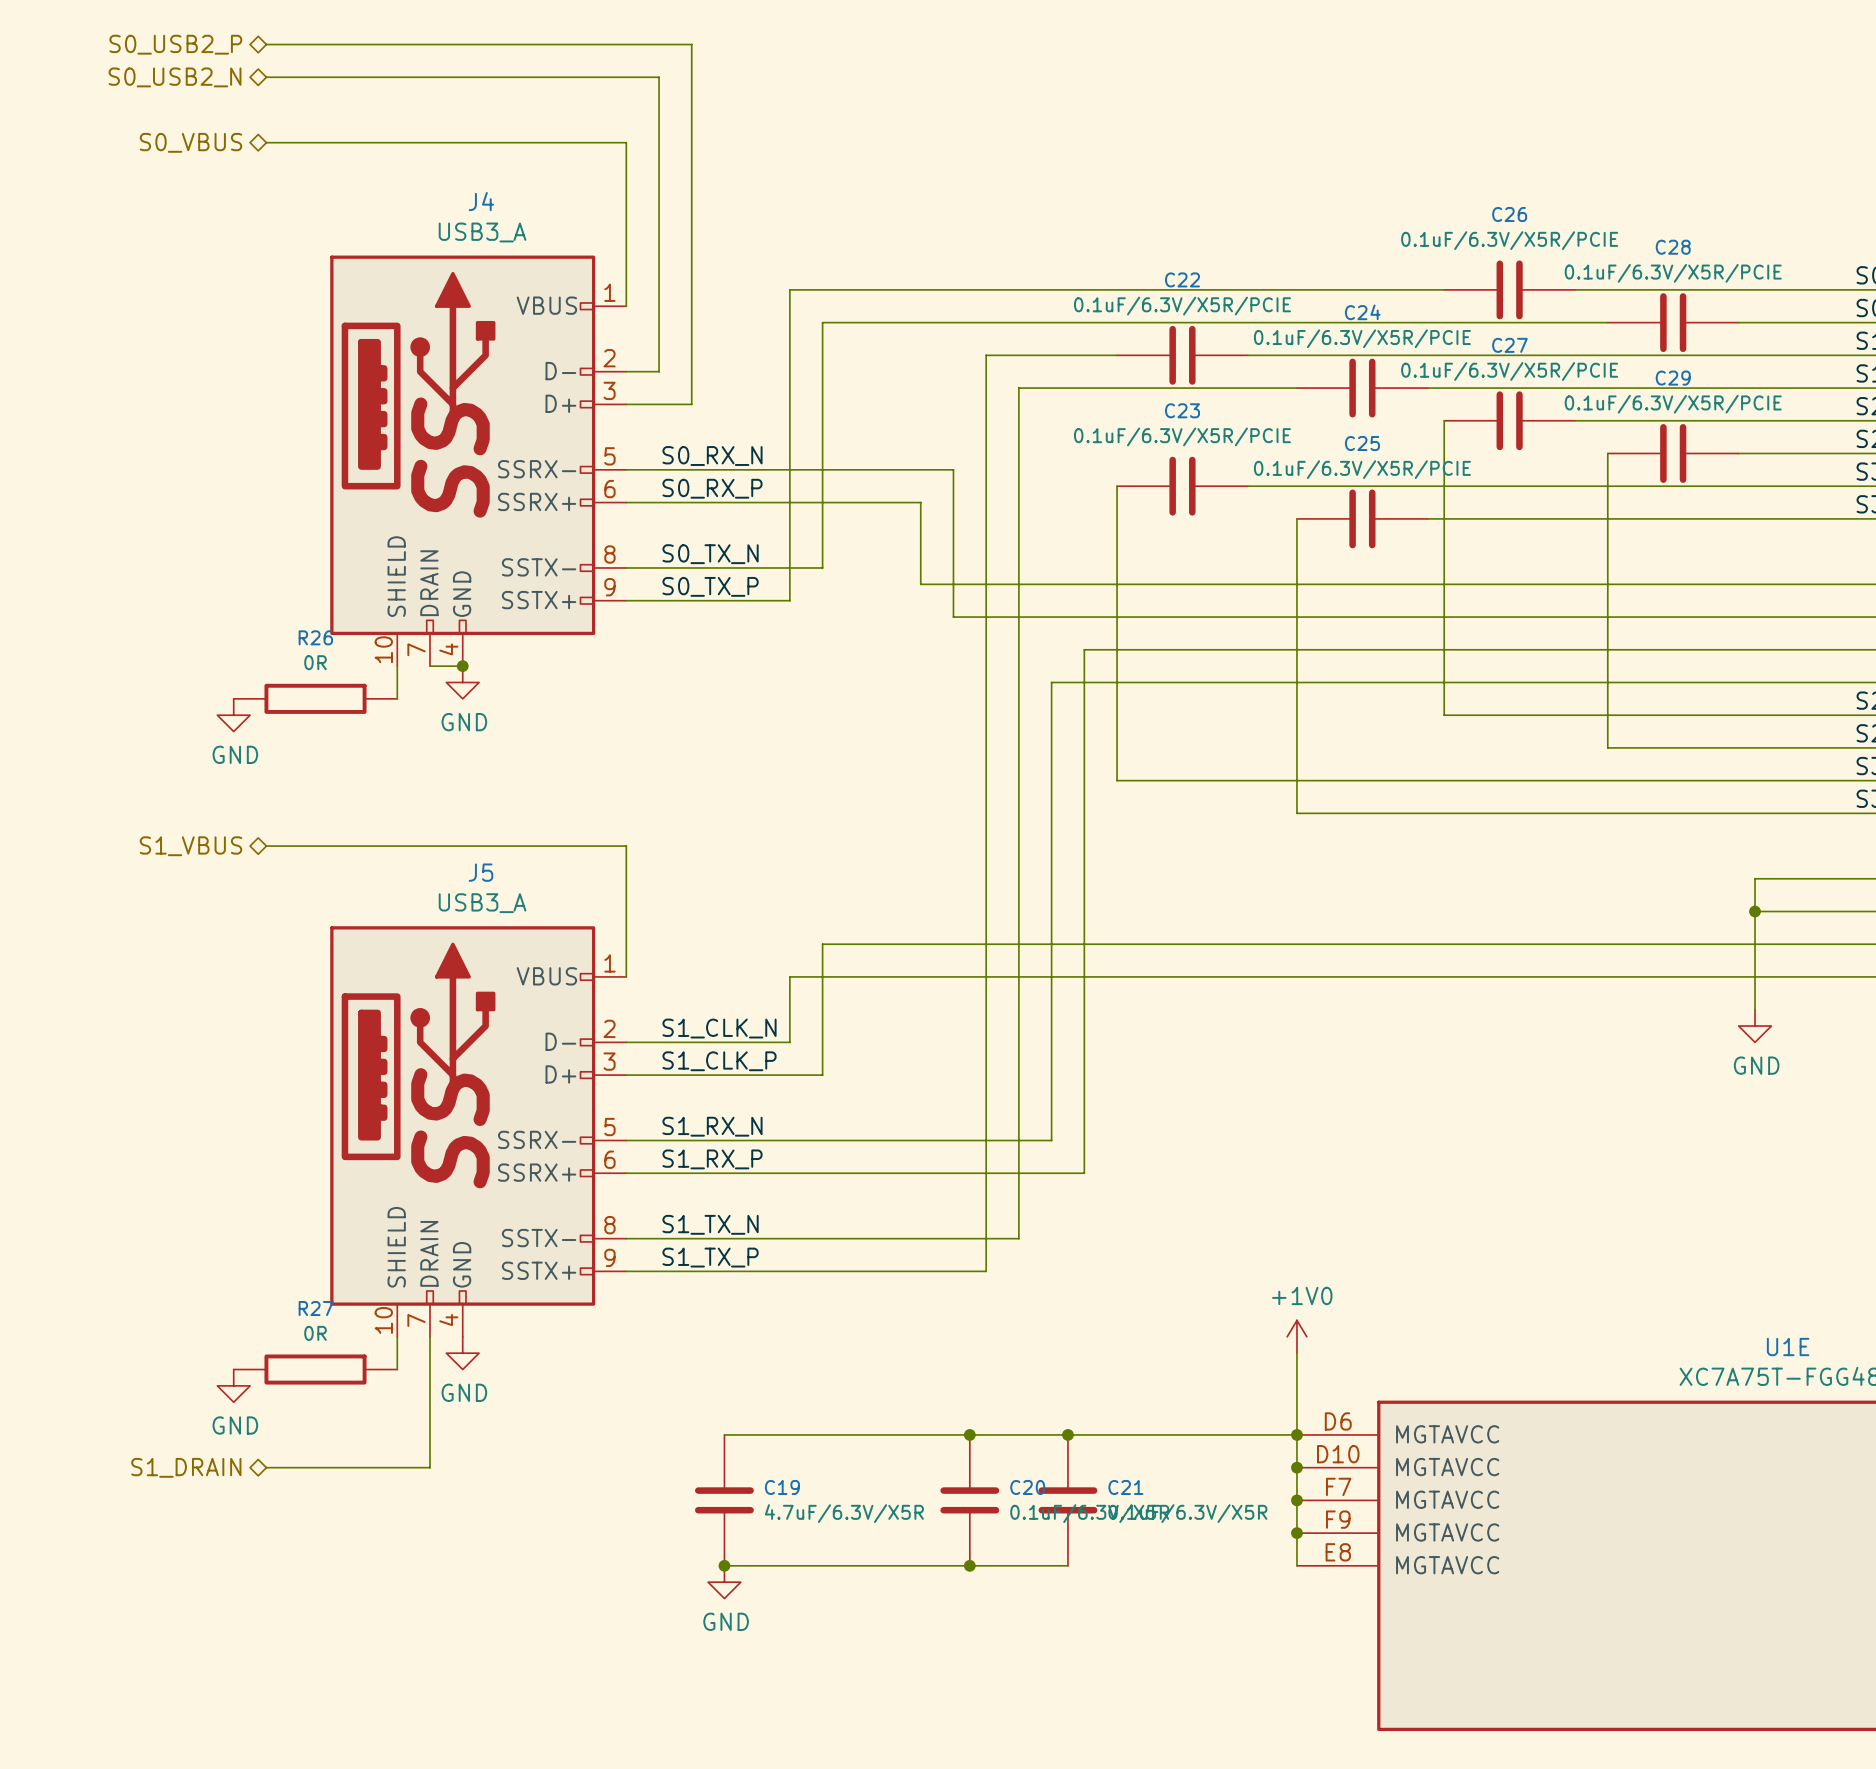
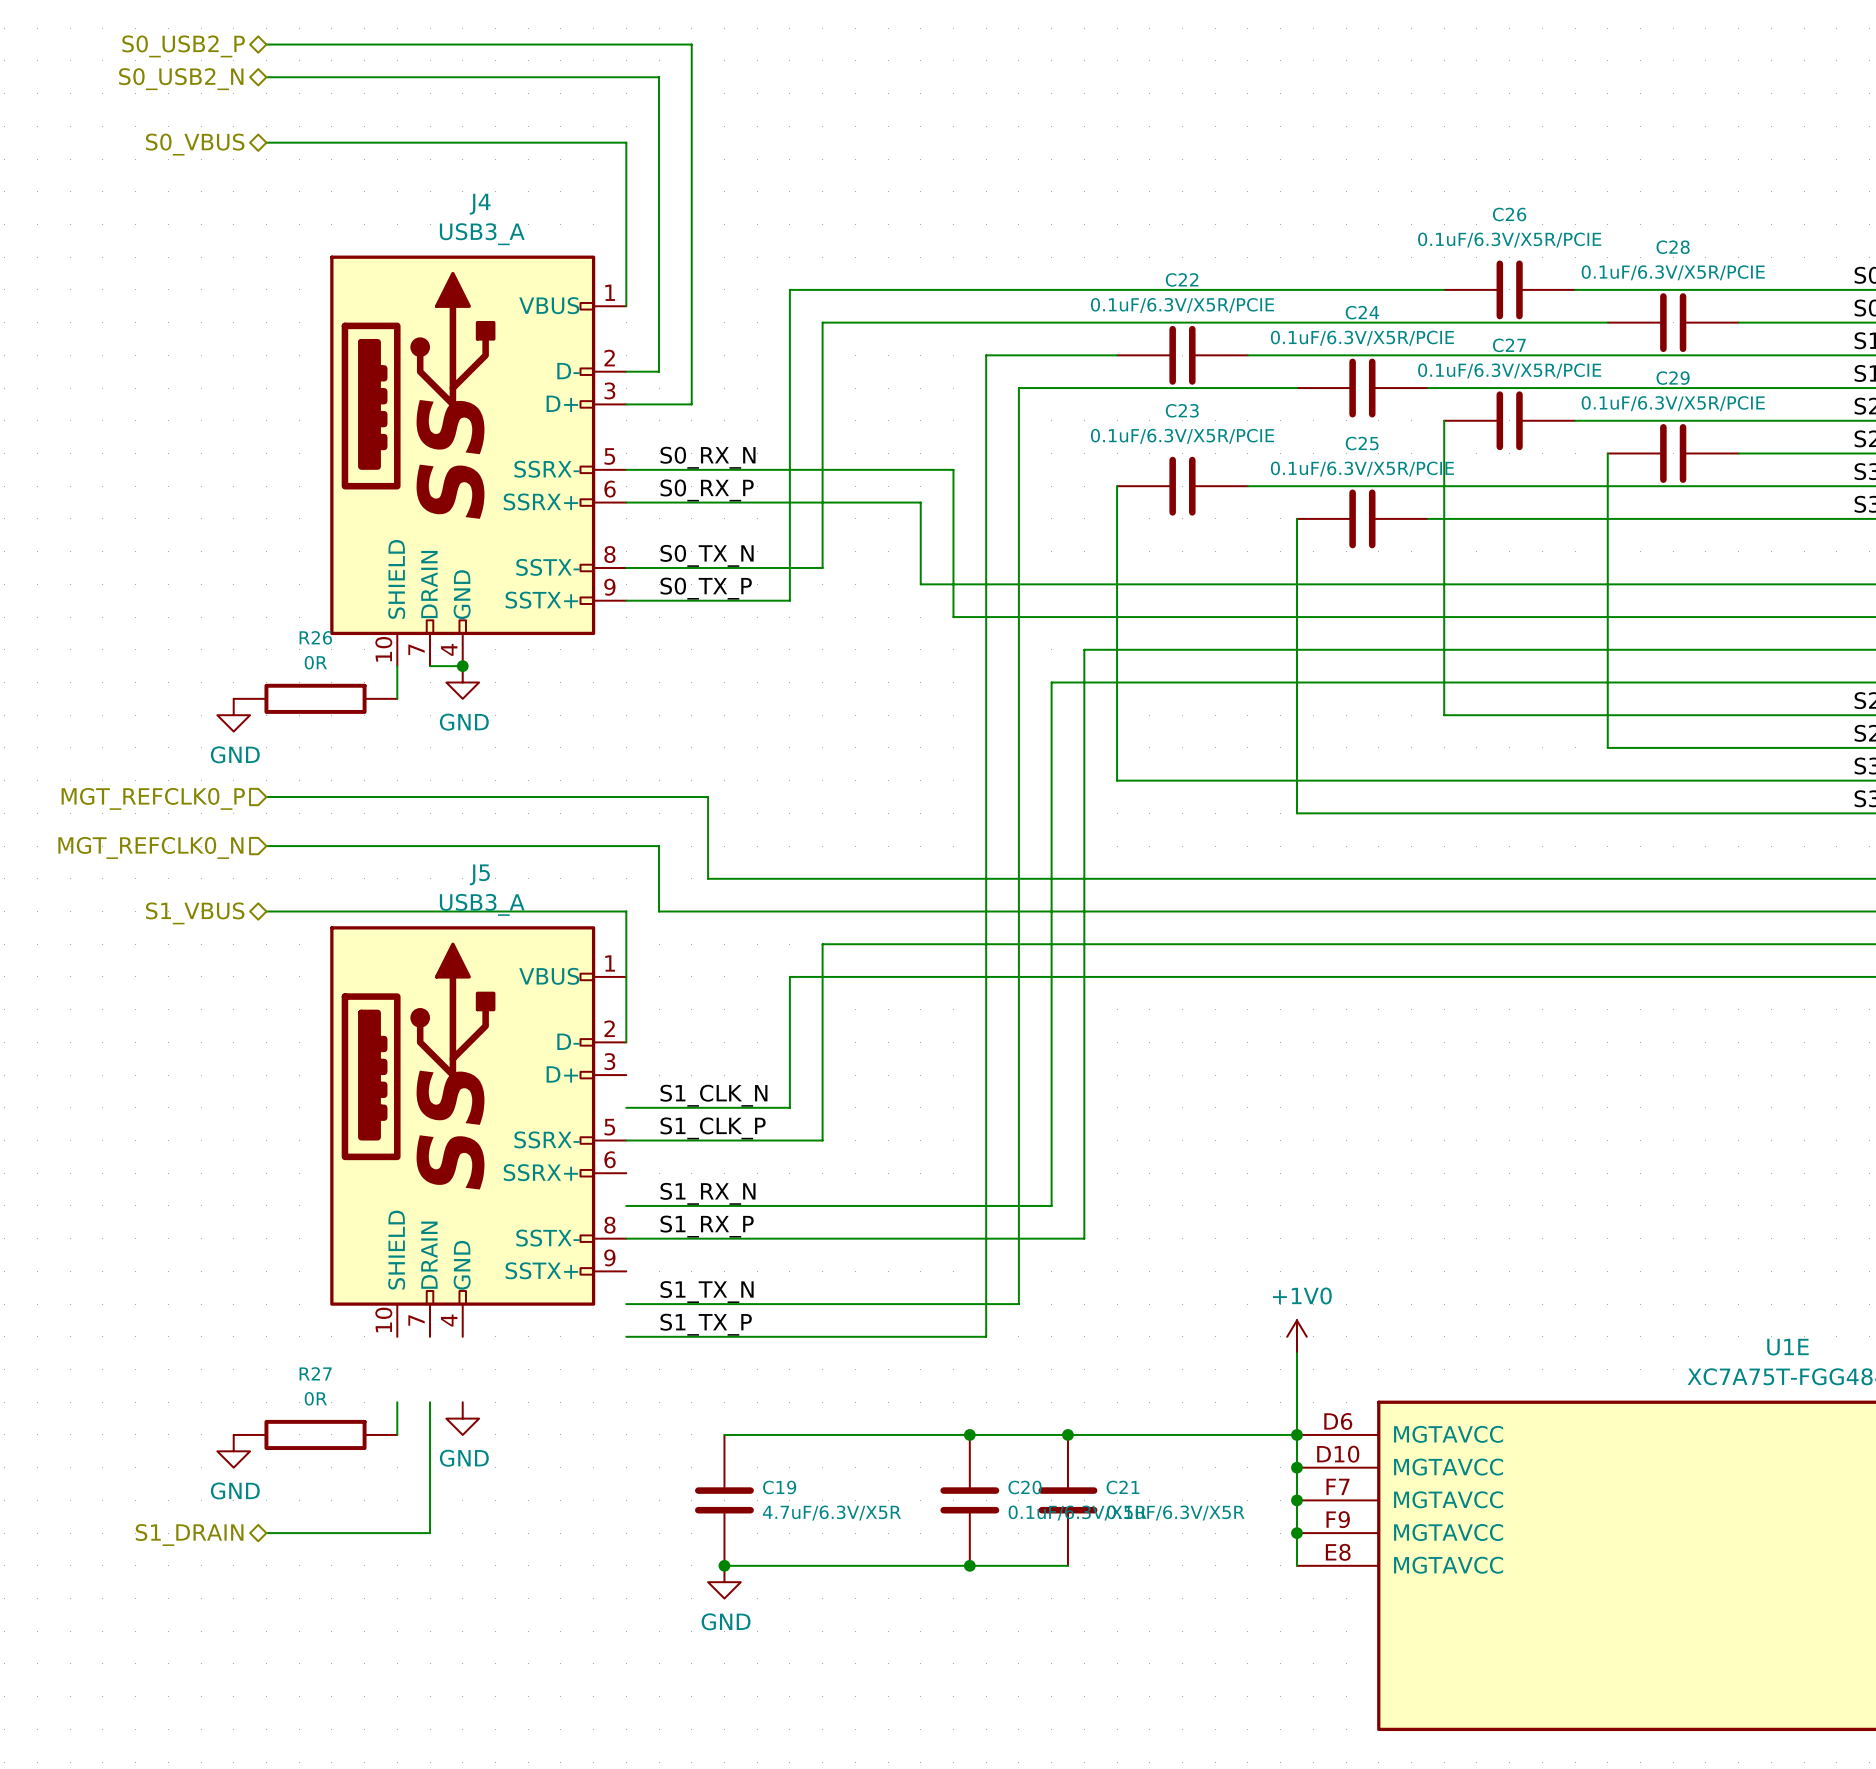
hierarchical label: none -> MGT_REFCLK0_P (153, 798)
hierarchical label shape: bidirectional (191, 846) -> input (150, 847)
hierarchical label: S1_VBUS (191, 846) -> MGT_REFCLK0_N (150, 847)
wire: (626, 846) (626, 911) -> (266, 911) (626, 911)
wire: none -> (626, 846) (659, 846) (659, 911) (1755, 911)
wire: (1755, 878) (1755, 1009) -> (1755, 878) (708, 878) (708, 797) (266, 797)
hierarchical label: none -> S1_VBUS (195, 913)
junction: (1755, 911) -> none
wire: none -> (626, 976) (626, 1042)
power symbol: GND (1755, 1026) -> none
label position: S1_CLK_N (719, 1028) -> S1_CLK_N (713, 1095)
wire: (626, 1042) (789, 1042) -> (626, 1107) (789, 1107) (789, 1042)
label: S1_CLK_P (719, 1061) -> none
wire: (626, 1075) (822, 1075) -> (822, 1140) (822, 1075)
label: S1_RX_N (712, 1126) -> S1_CLK_P (713, 1128)
wire: (822, 1140) (1051, 1140) -> (626, 1205) (1051, 1205) (1051, 1140)
label: S1_RX_P (712, 1159) -> S1_RX_N (708, 1193)
wire: (626, 1173) (1084, 1173) -> (626, 1304) (1018, 1304) (1018, 1238) (1084, 1238) (1084, 1173)
label: S1_TX_N (710, 1224) -> S1_RX_P (707, 1226)
label position: S1_TX_P (710, 1257) -> S1_TX_P (706, 1324)
wire: (626, 1271) (986, 1271) -> (626, 1336) (986, 1336) (986, 1271)
label: none -> S1_TX_N (707, 1292)
wire: (397, 1336) (397, 1369) -> (397, 1402) (397, 1434)
wire: (430, 1336) (430, 1402) -> none
power symbol position: GND (462, 1353) -> GND (462, 1418)
R27 position: (315, 1369) -> (315, 1434)
power symbol position: GND (233, 1385) -> GND (233, 1451)
hierarchical label position: S1_DRAIN (186, 1467) -> S1_DRAIN (189, 1534)
wire: (266, 1467) (430, 1467) -> (266, 1533) (430, 1533) (430, 1467)

